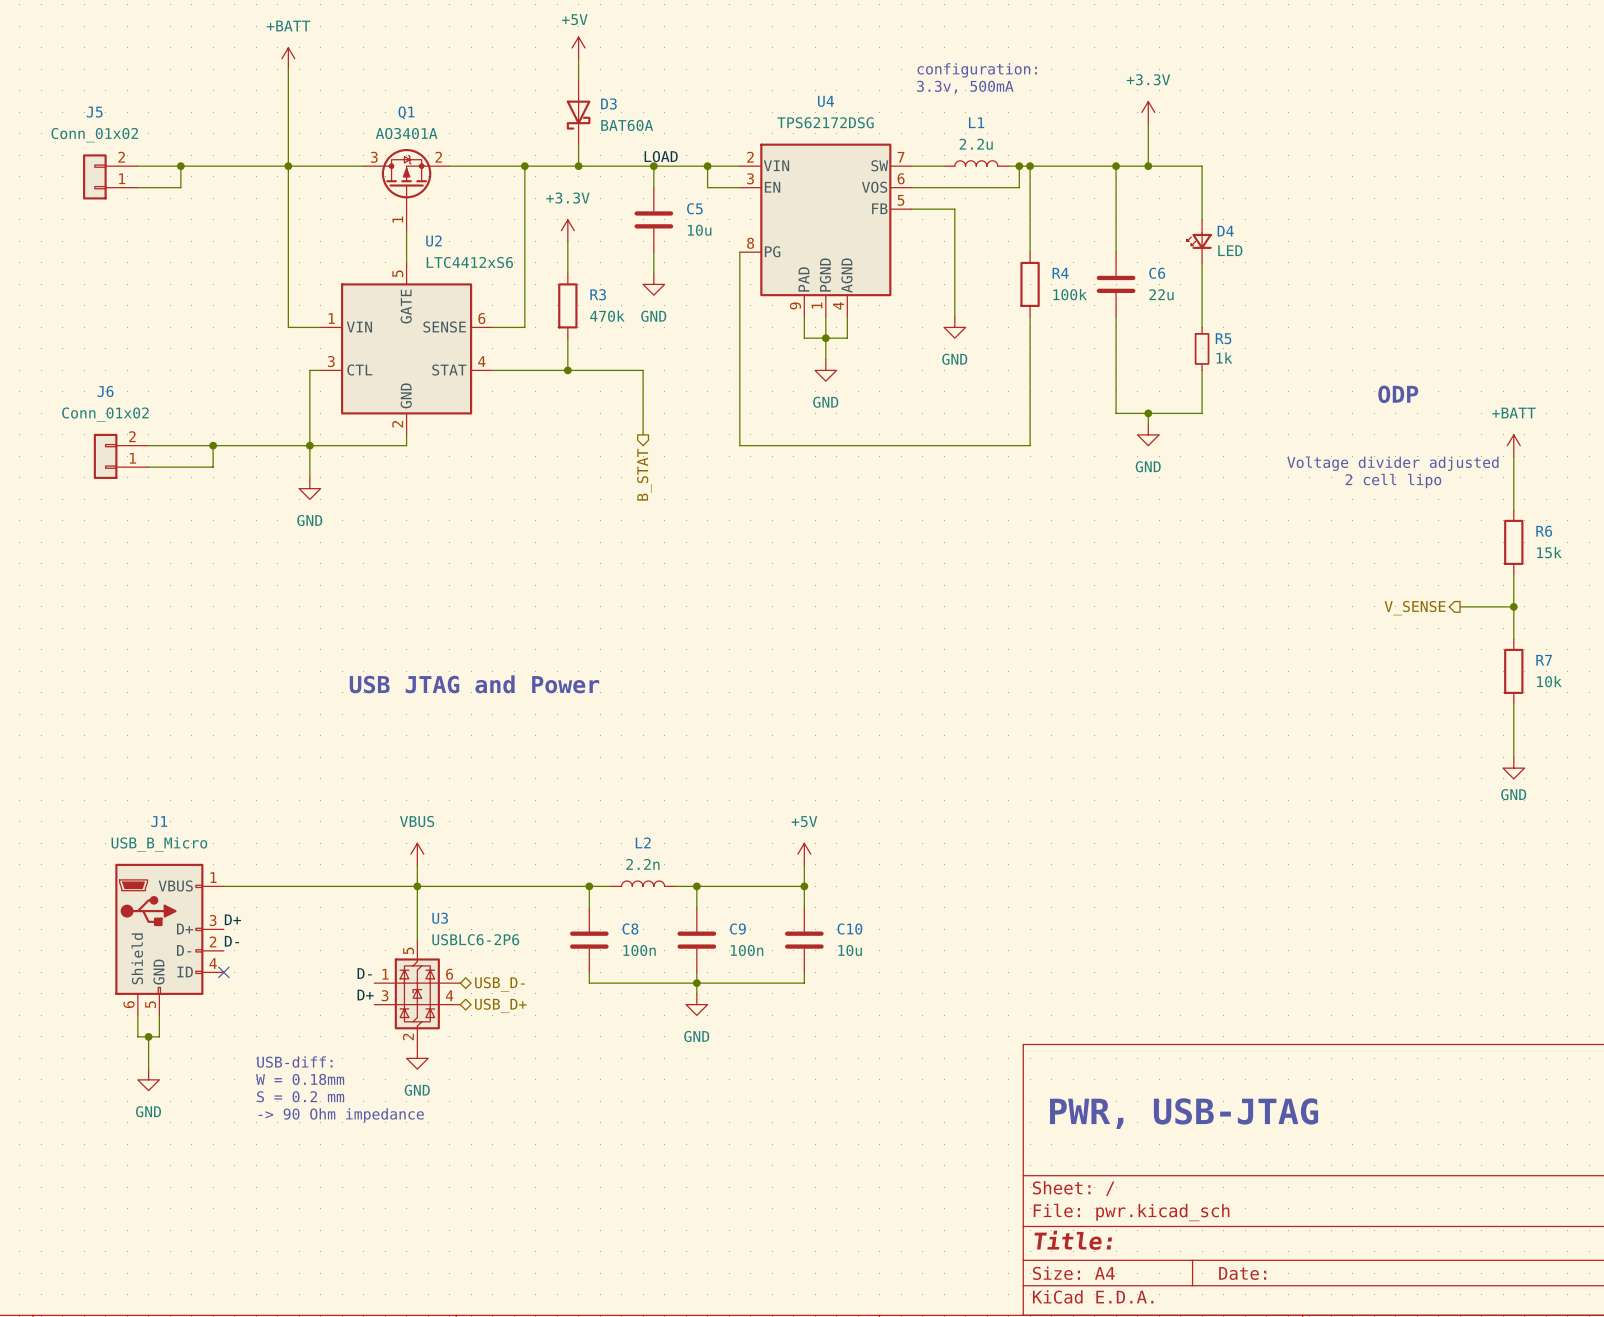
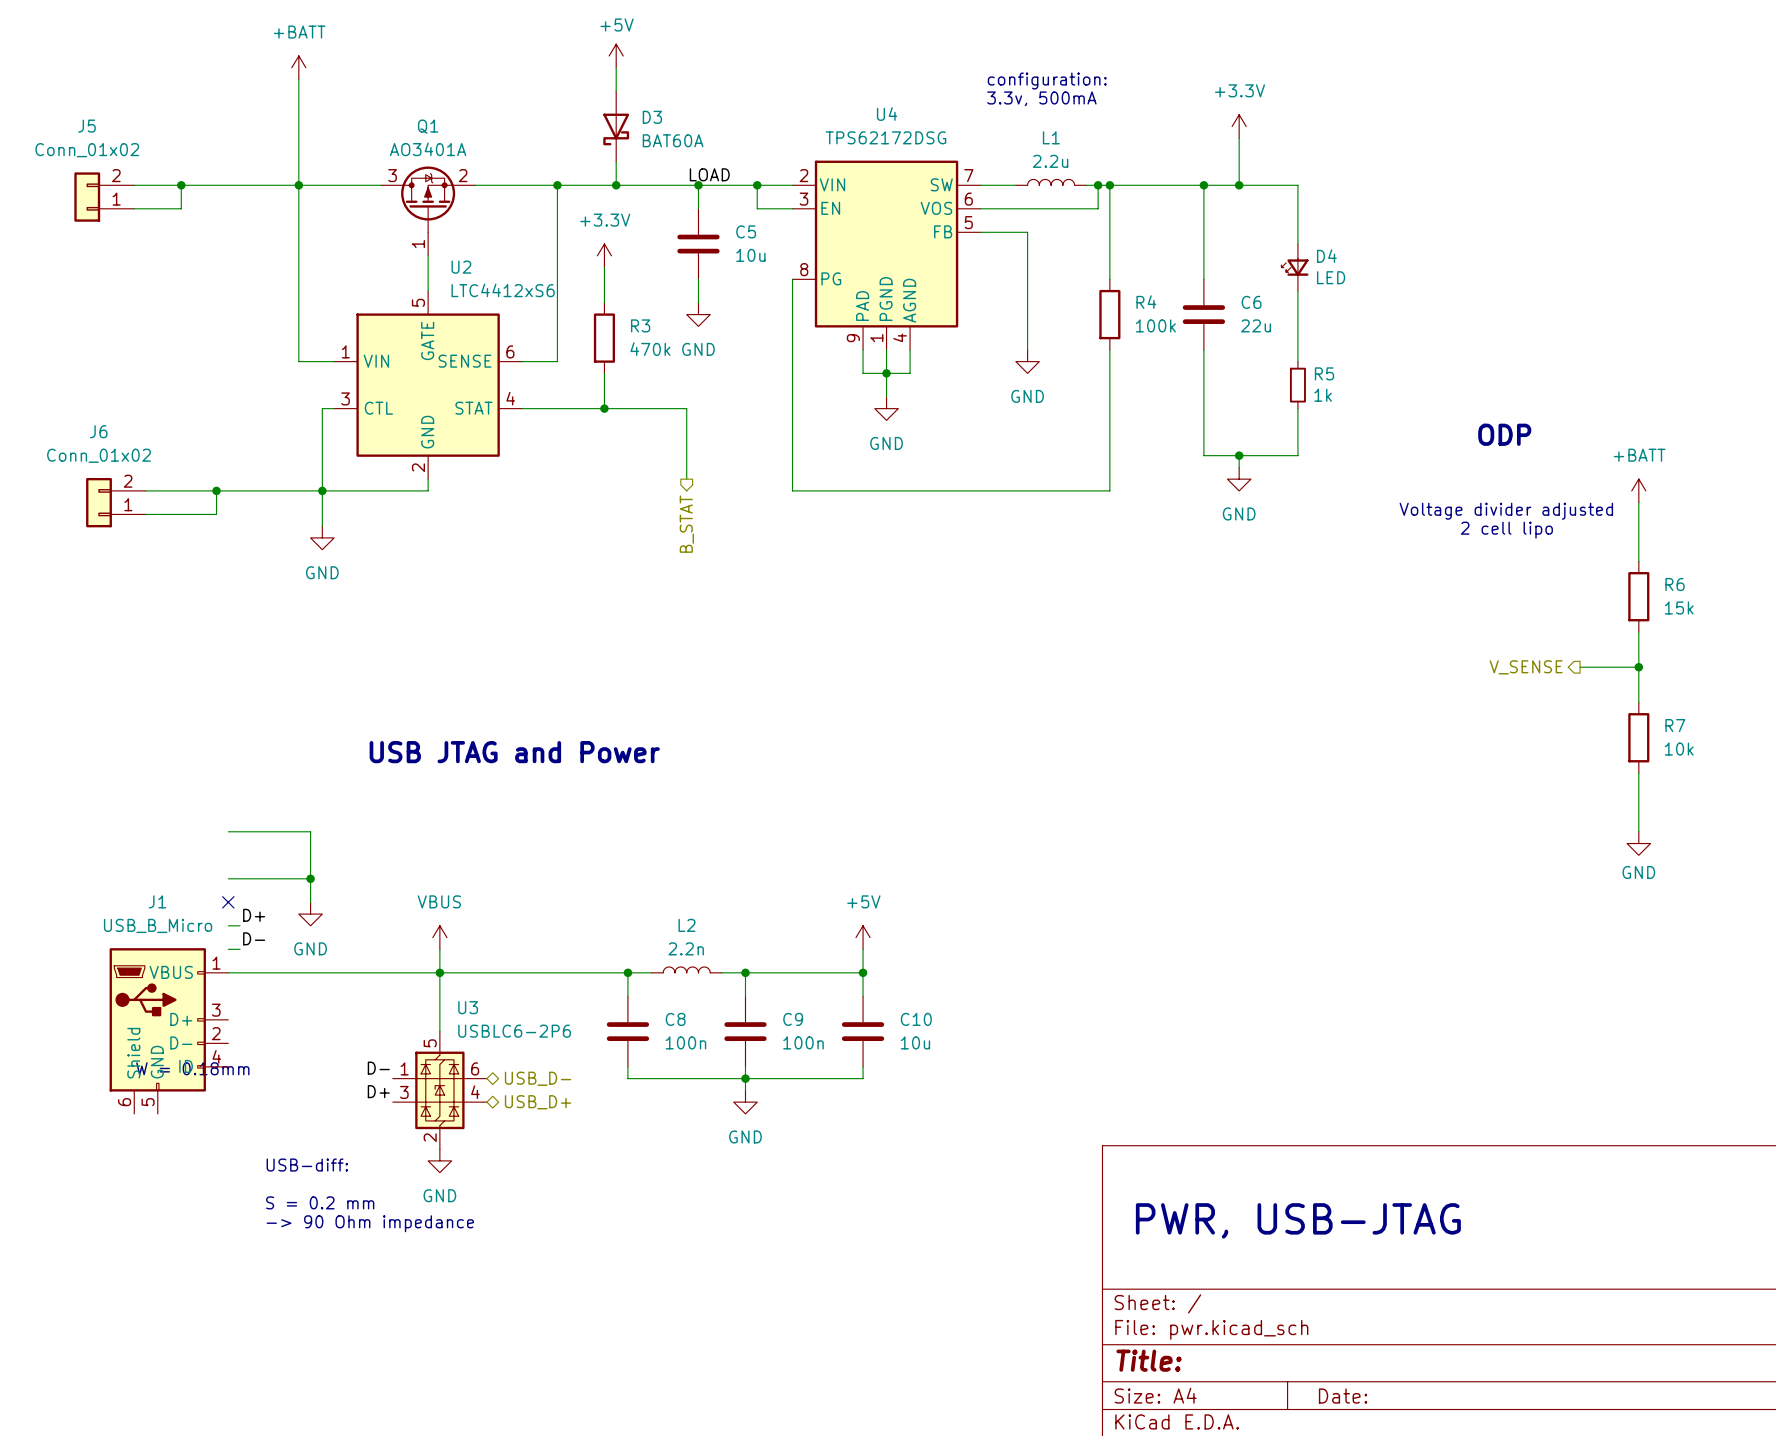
wire: none -> (228, 831) (310, 831) (310, 902)
wire: none -> (228, 878) (310, 878)
junction: none -> (310, 878)
no-connect mark: none -> (228, 902)
power symbol: none -> GND (310, 914)
wire: none -> (228, 925) (240, 925)
wire: none -> (228, 949) (240, 949)
label position: D+ (232, 919) -> D+ (254, 915)
label position: D- (231, 941) -> D- (254, 938)
no-connect mark: (223, 972) -> none
wire: (137, 1015) (137, 1036) (159, 1036) (159, 1015) -> none
wire: (148, 1036) (148, 1069) -> none
junction: (148, 1036) -> none
power symbol: GND (148, 1079) -> none
text position: W = 0.18mm (300, 1079) -> W = 0.18mm (192, 1068)

